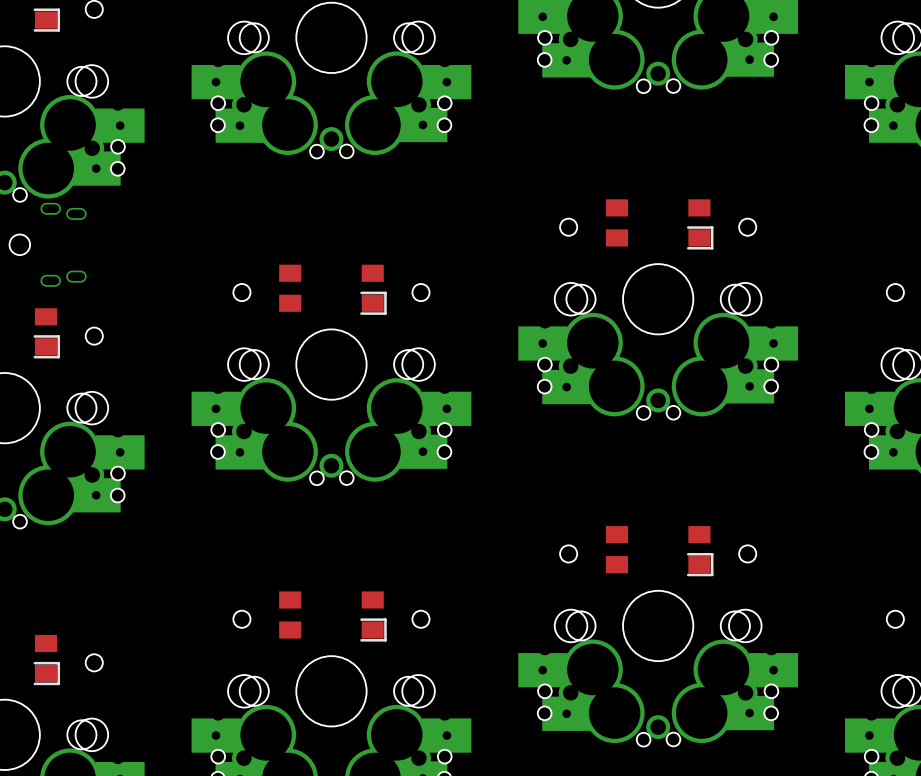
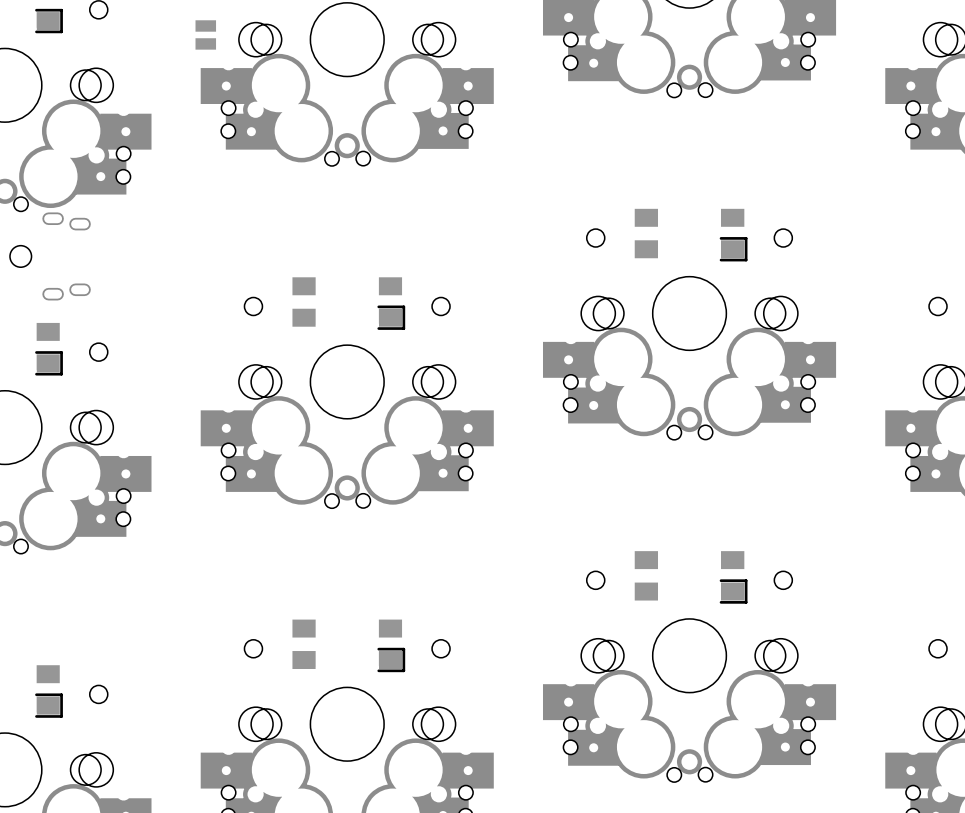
part: none -> (205, 34)

